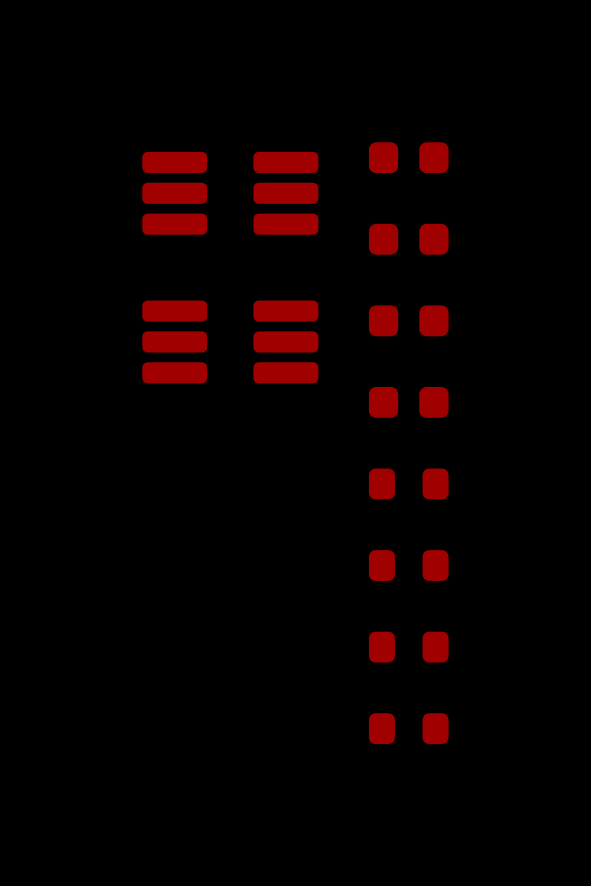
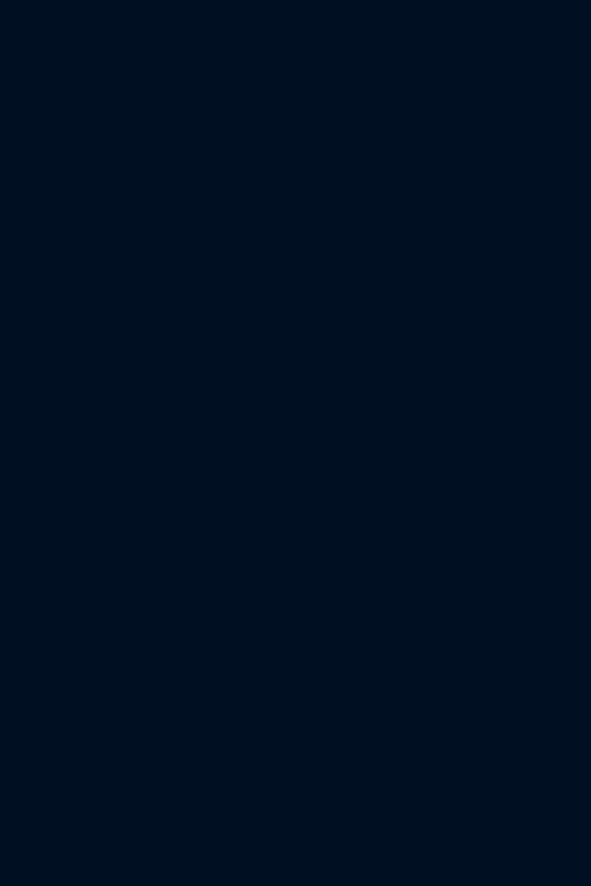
part: (408, 157) -> none
part: (230, 193) -> none
part: (408, 239) -> none
part: (408, 320) -> none
part: (230, 341) -> none
part: (408, 402) -> none
part: (408, 483) -> none
part: (408, 565) -> none
part: (408, 647) -> none
part: (408, 728) -> none

